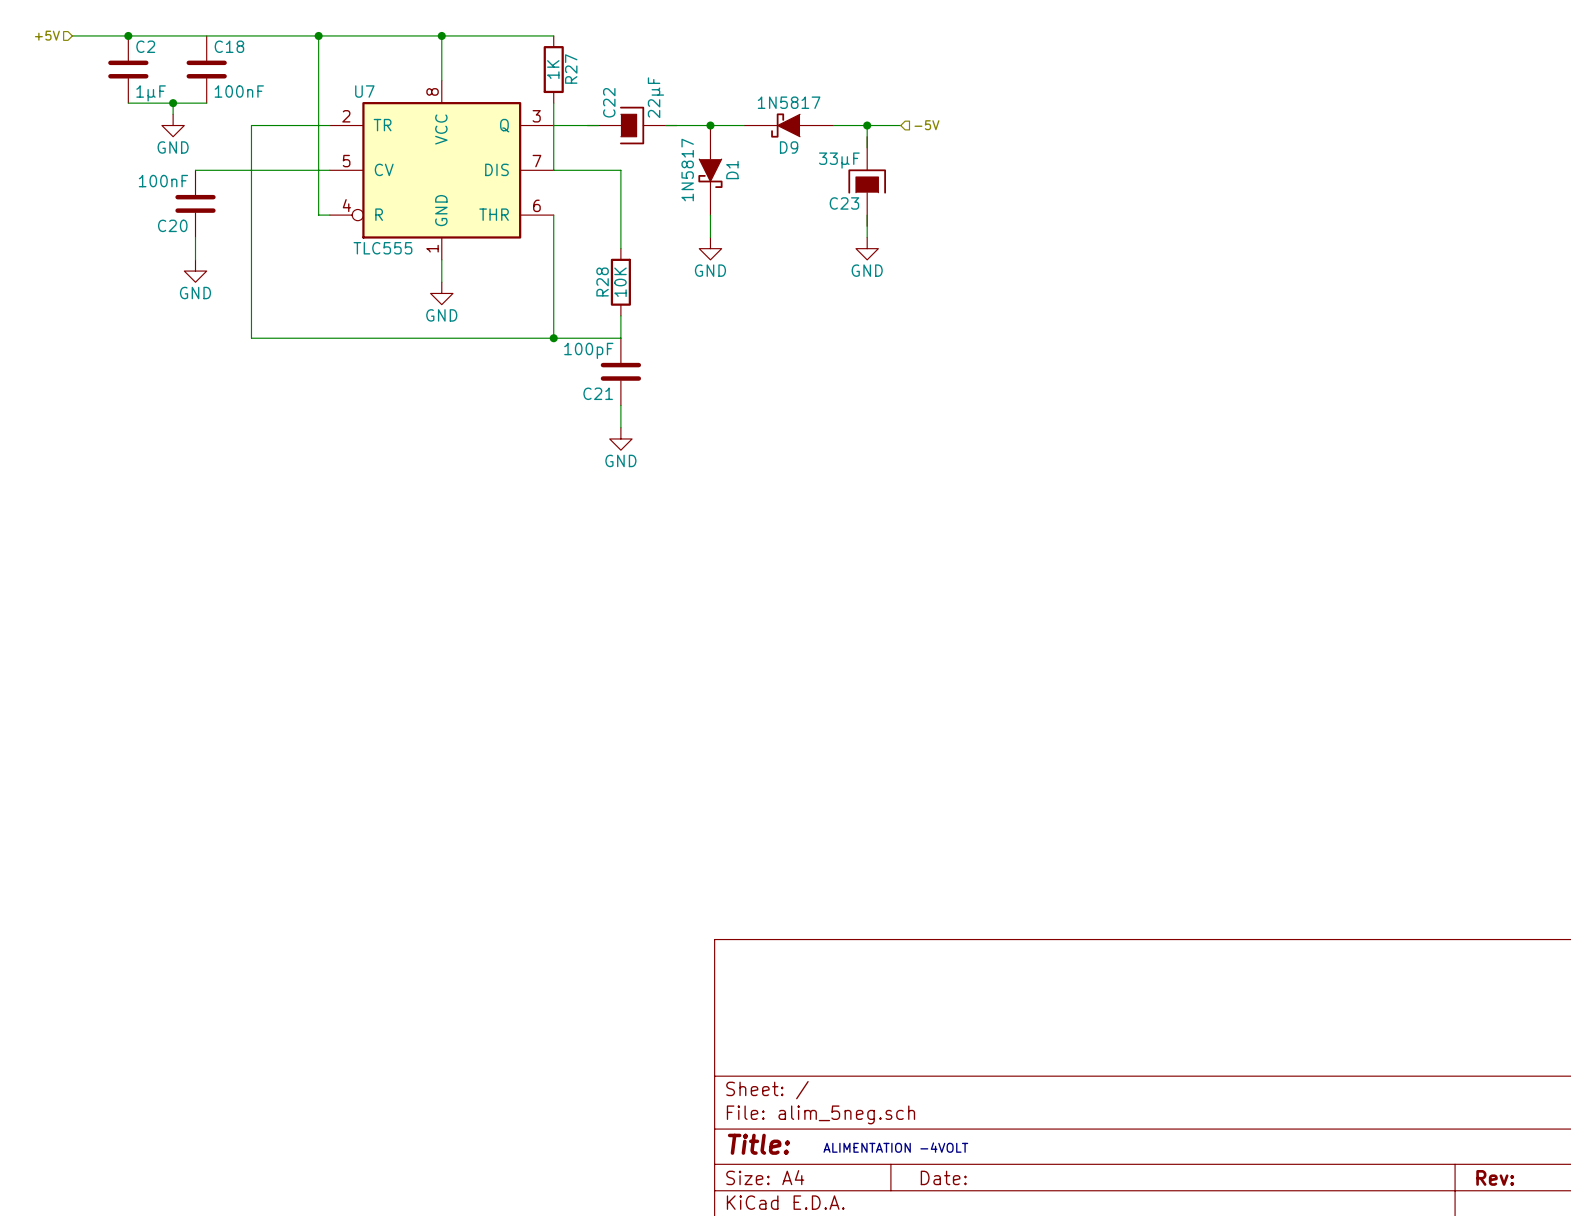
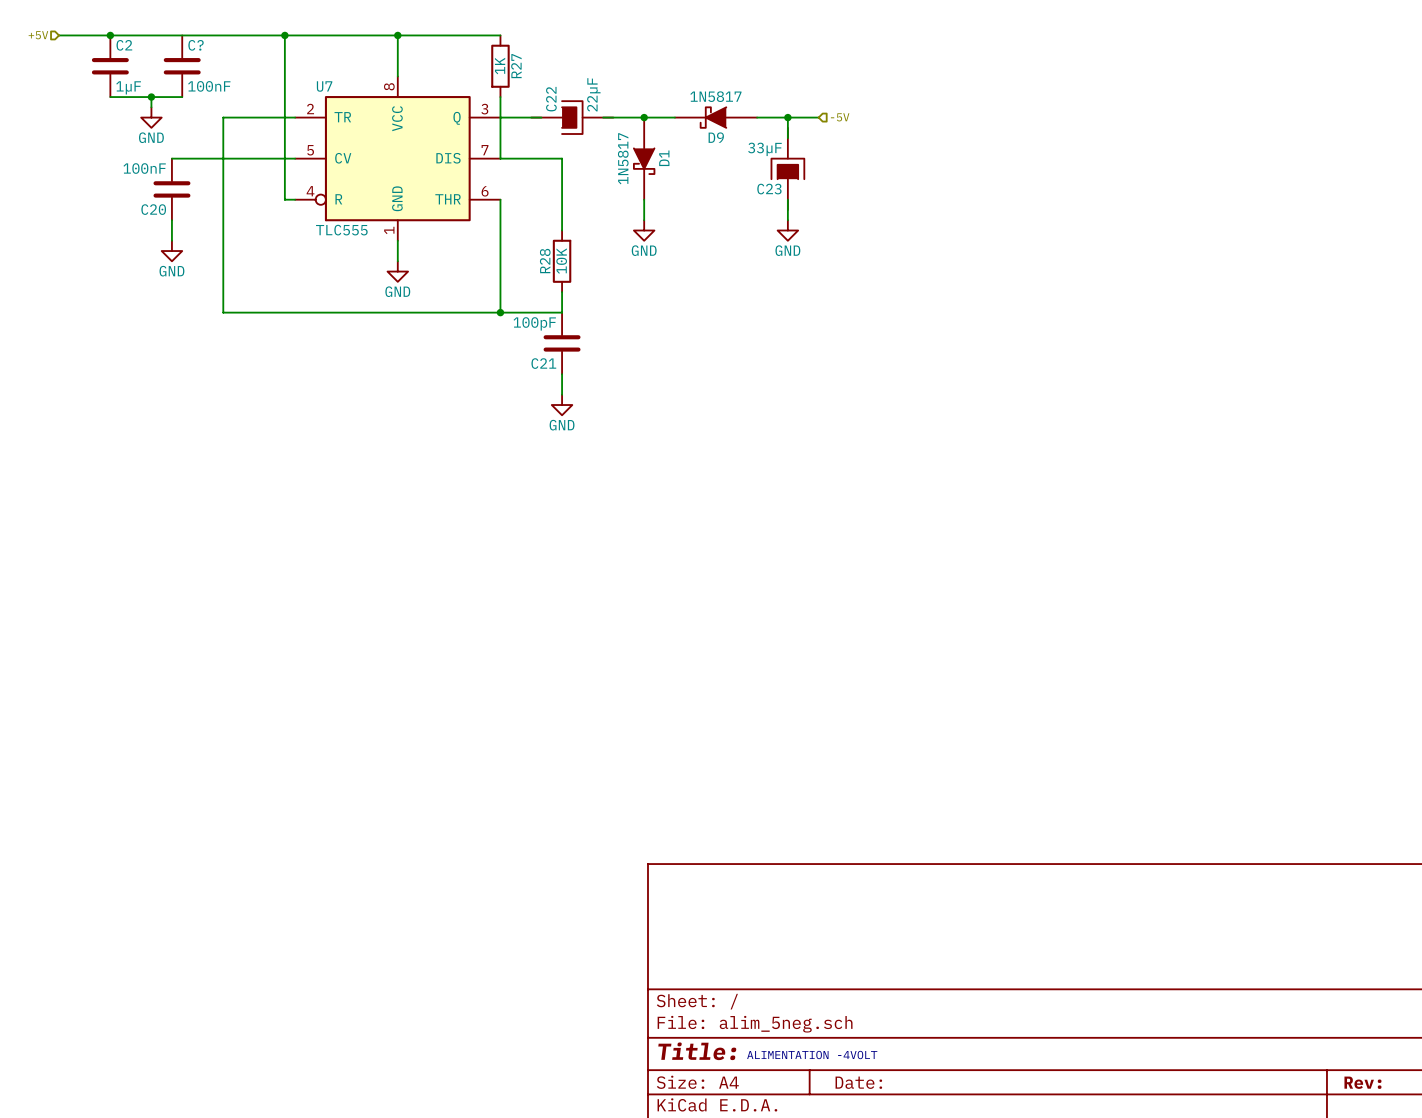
C18 name: C18 (229, 46) -> C? (196, 45)

